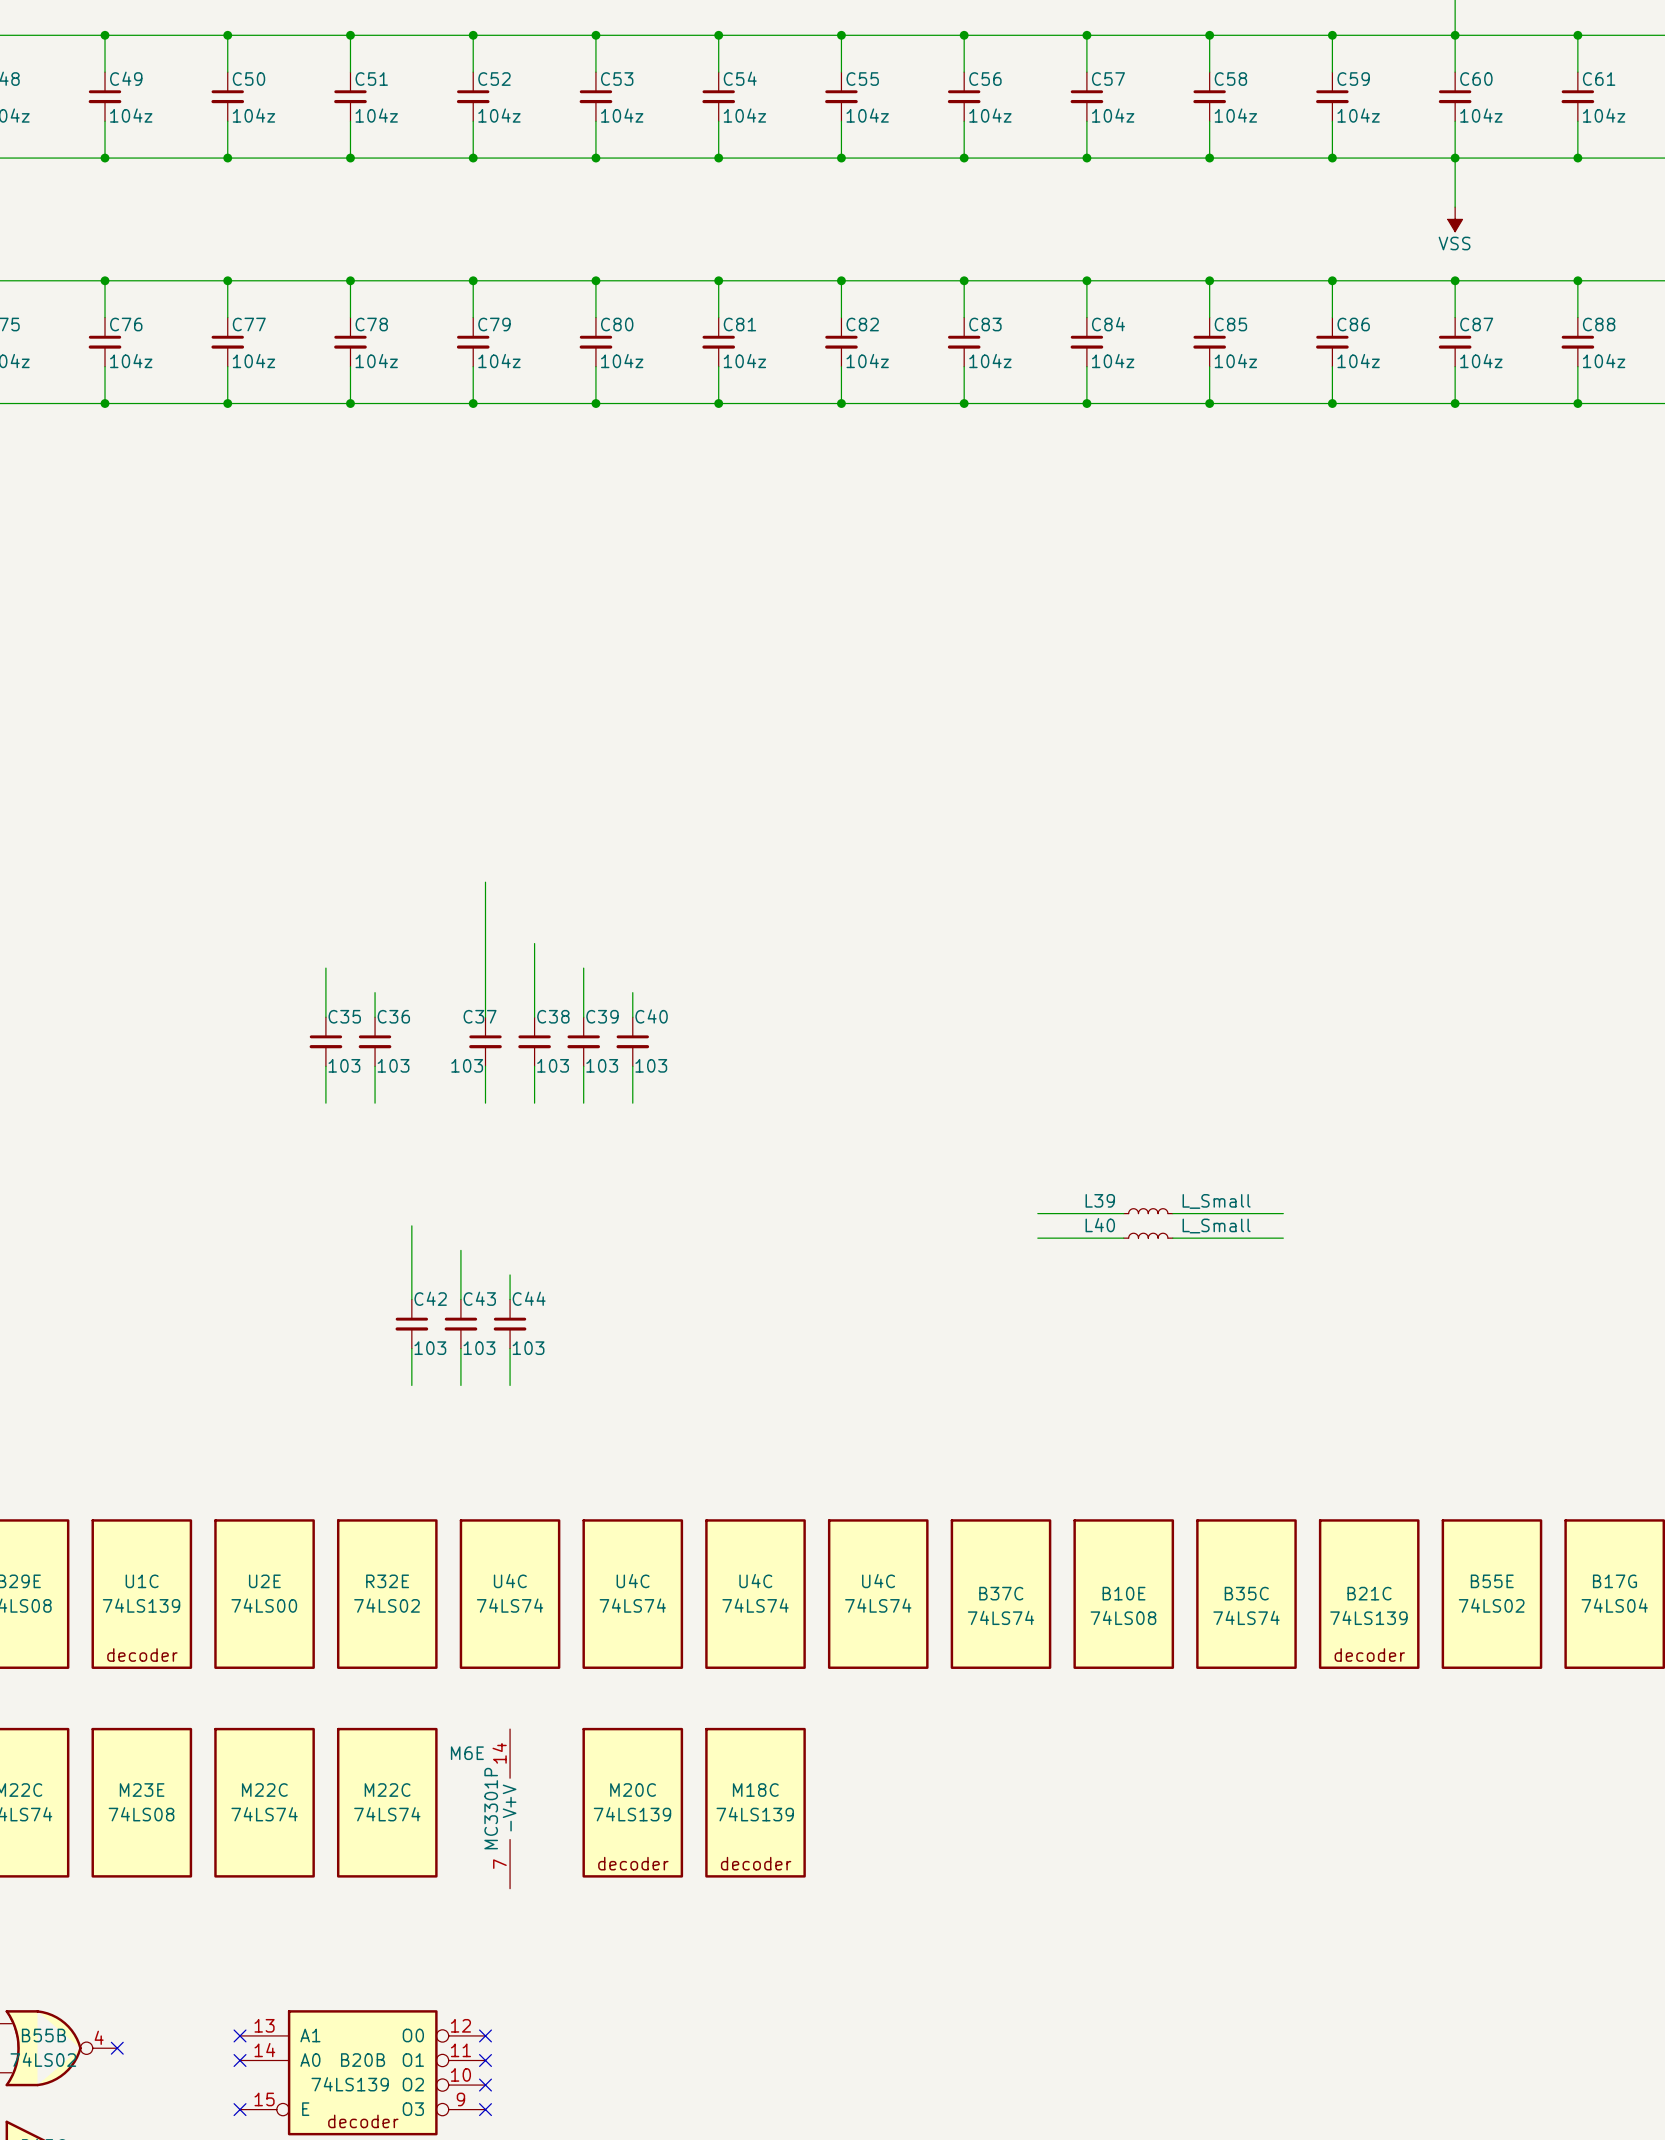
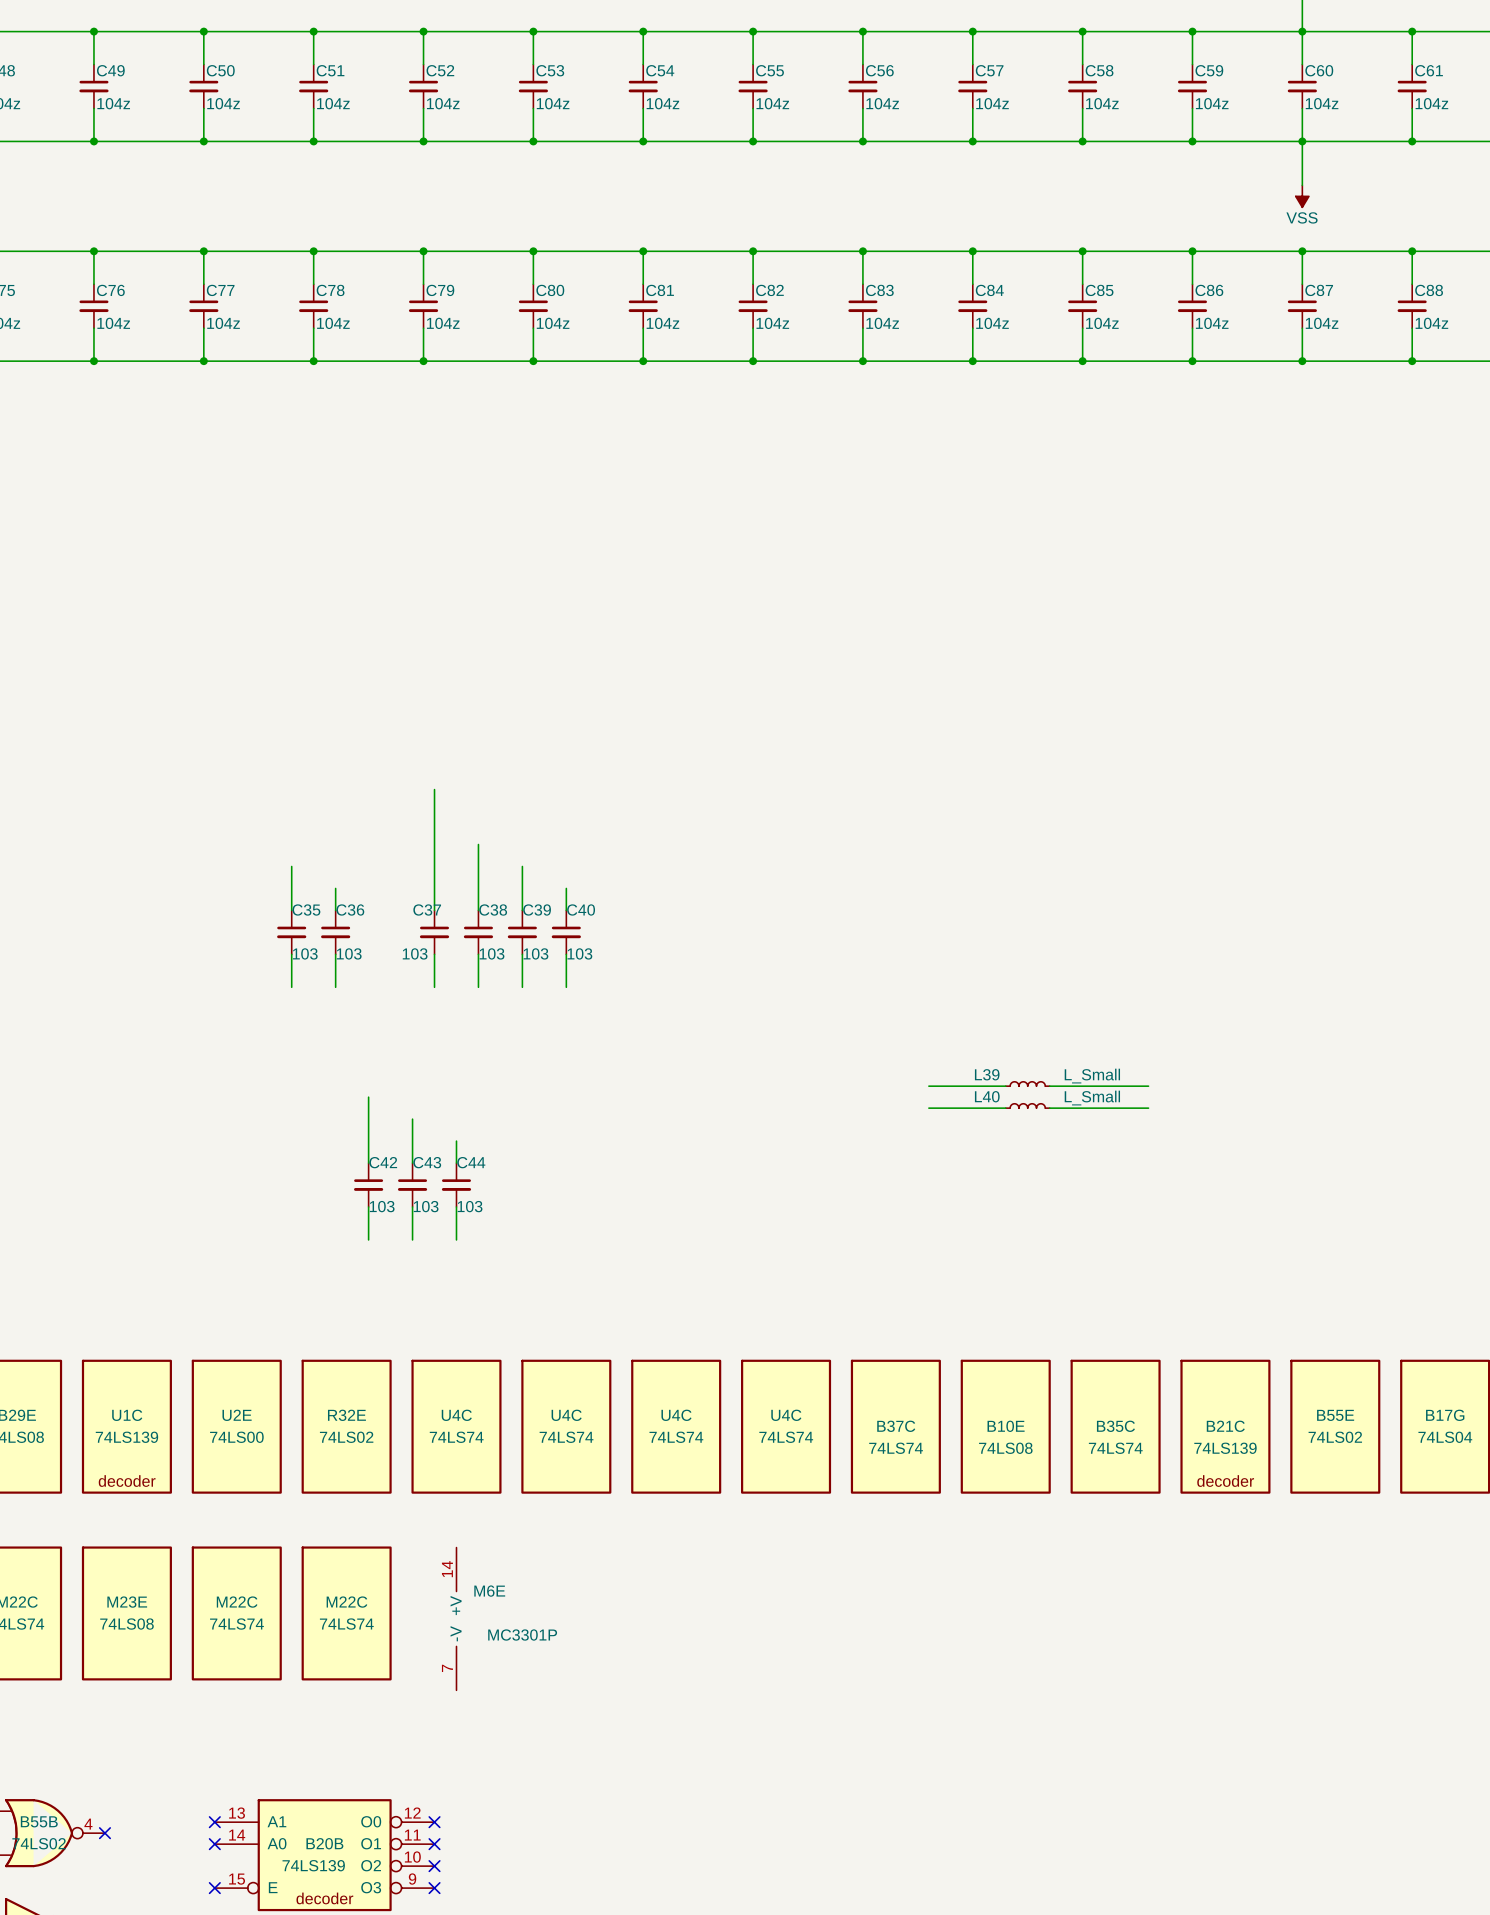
M6E name position: M6E (467, 1753) -> M6E (489, 1591)
M20C: 74LS139 (632, 1802) -> none
M18C: 74LS139 (755, 1802) -> none
M6E value rotation: 0° (491, 1808) -> 90° clockwise (522, 1635)

